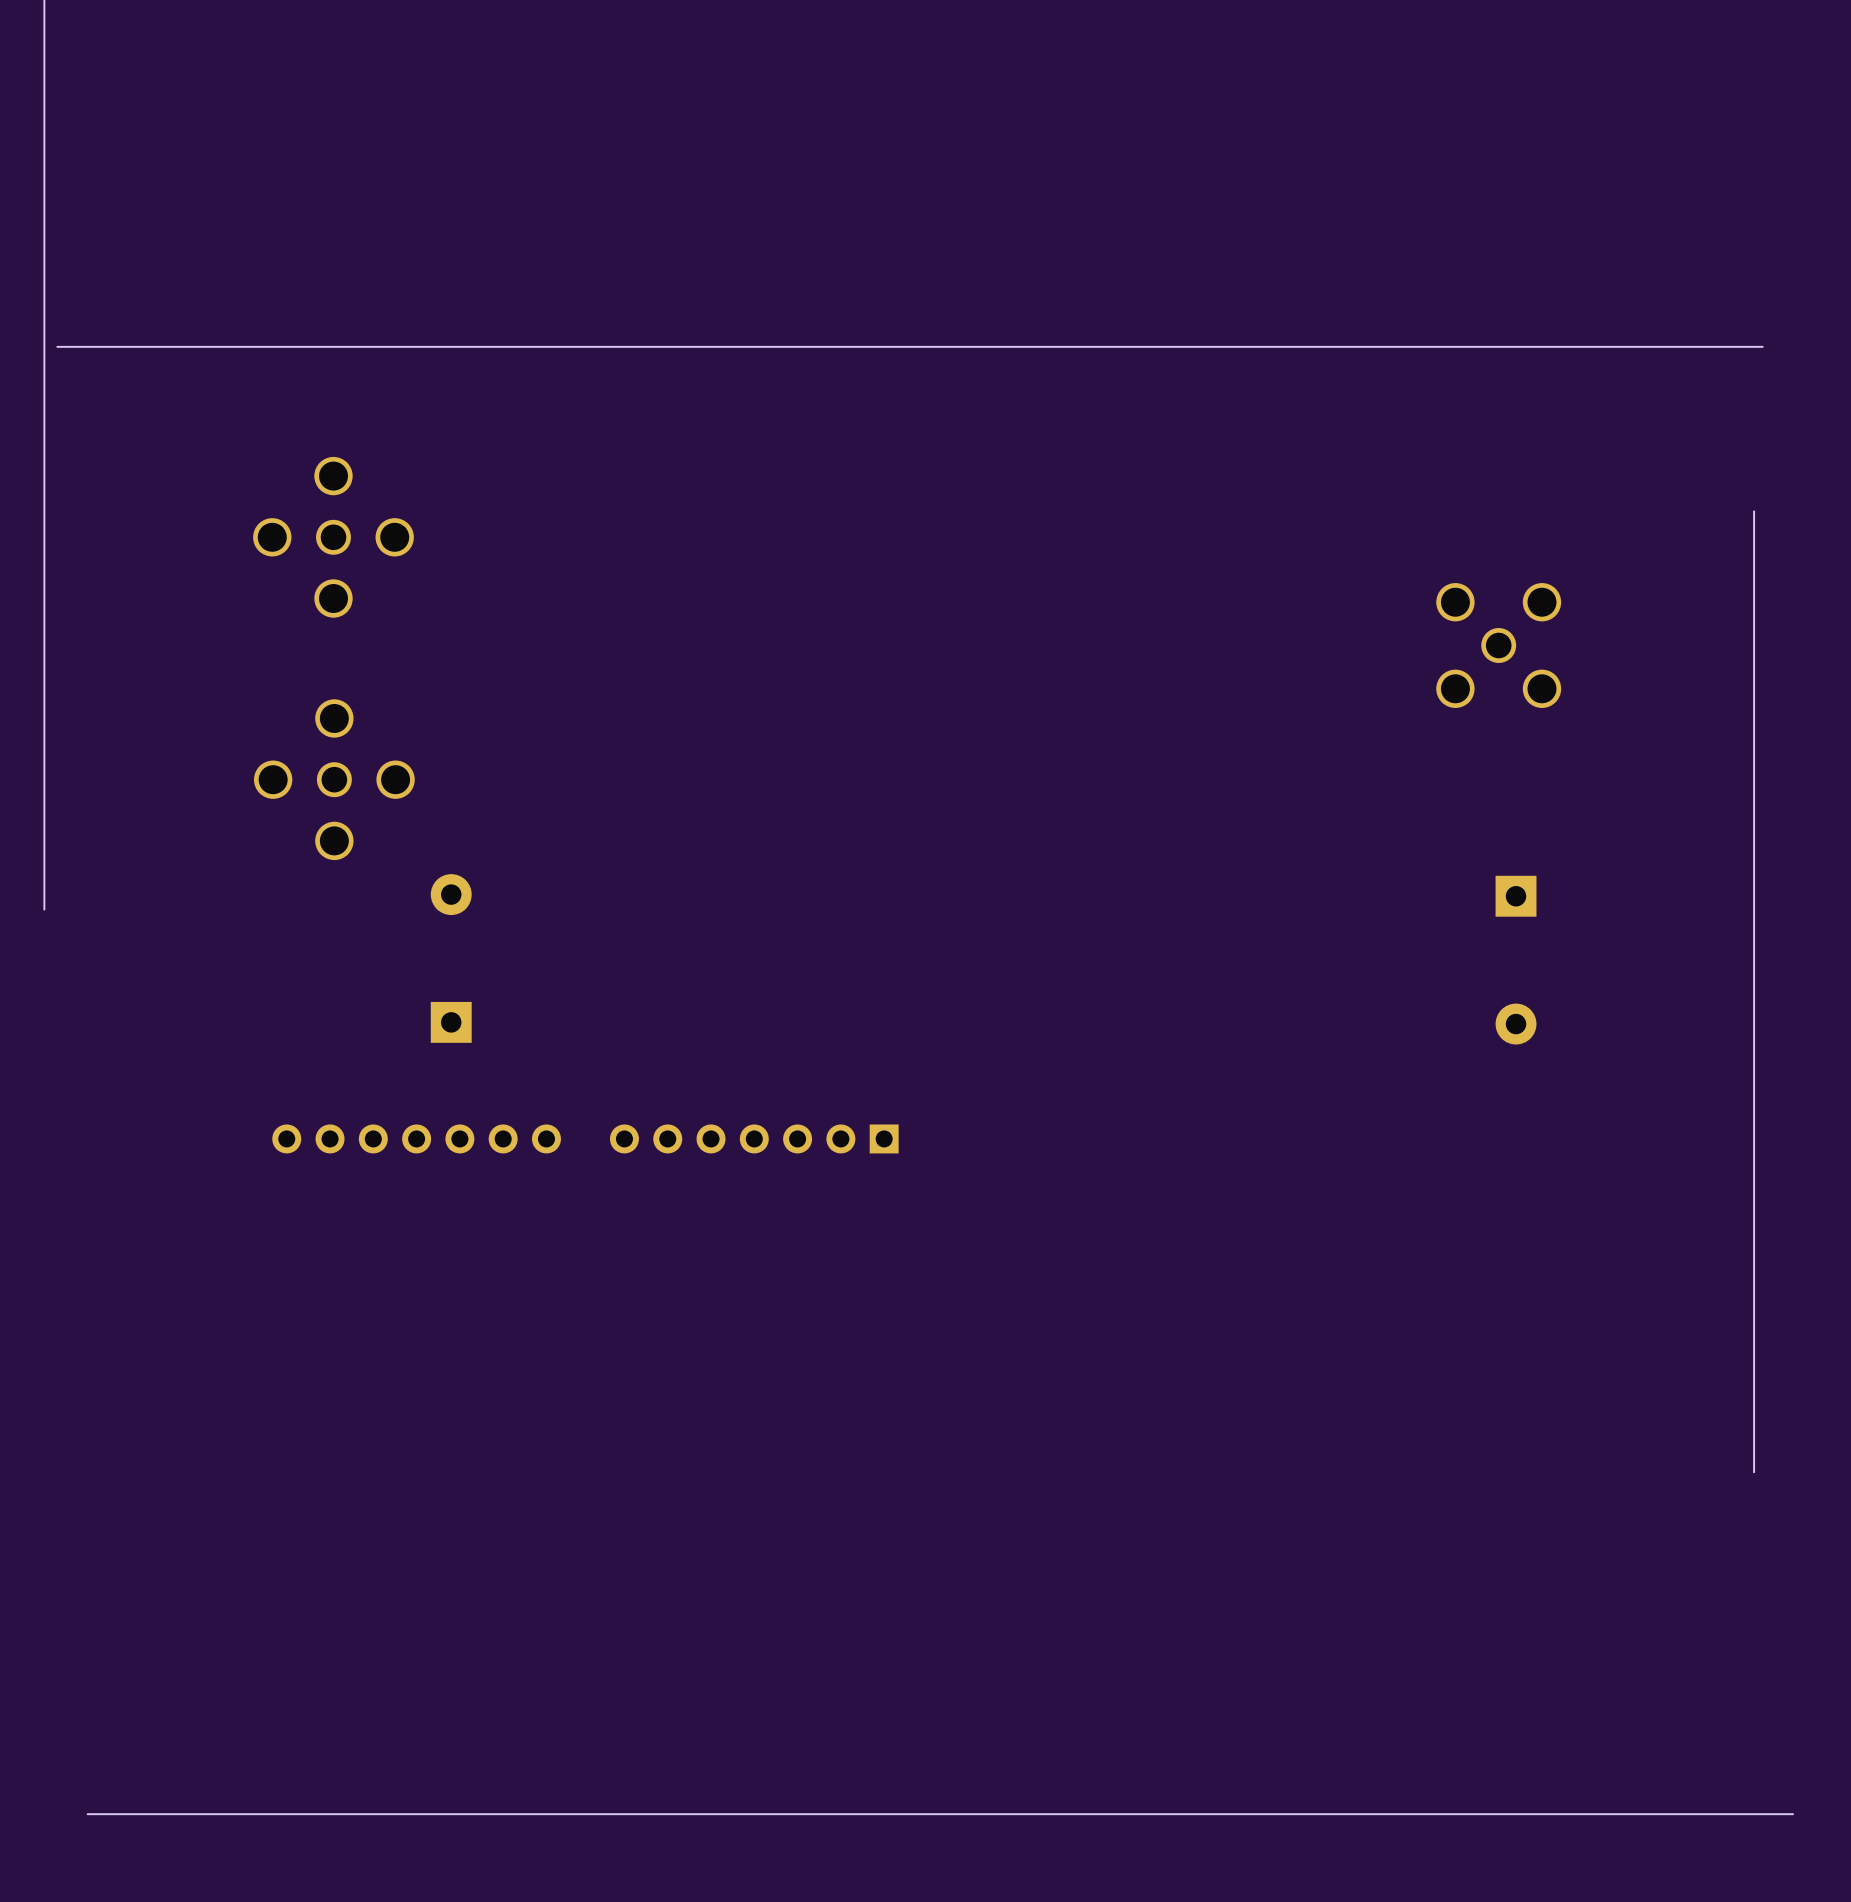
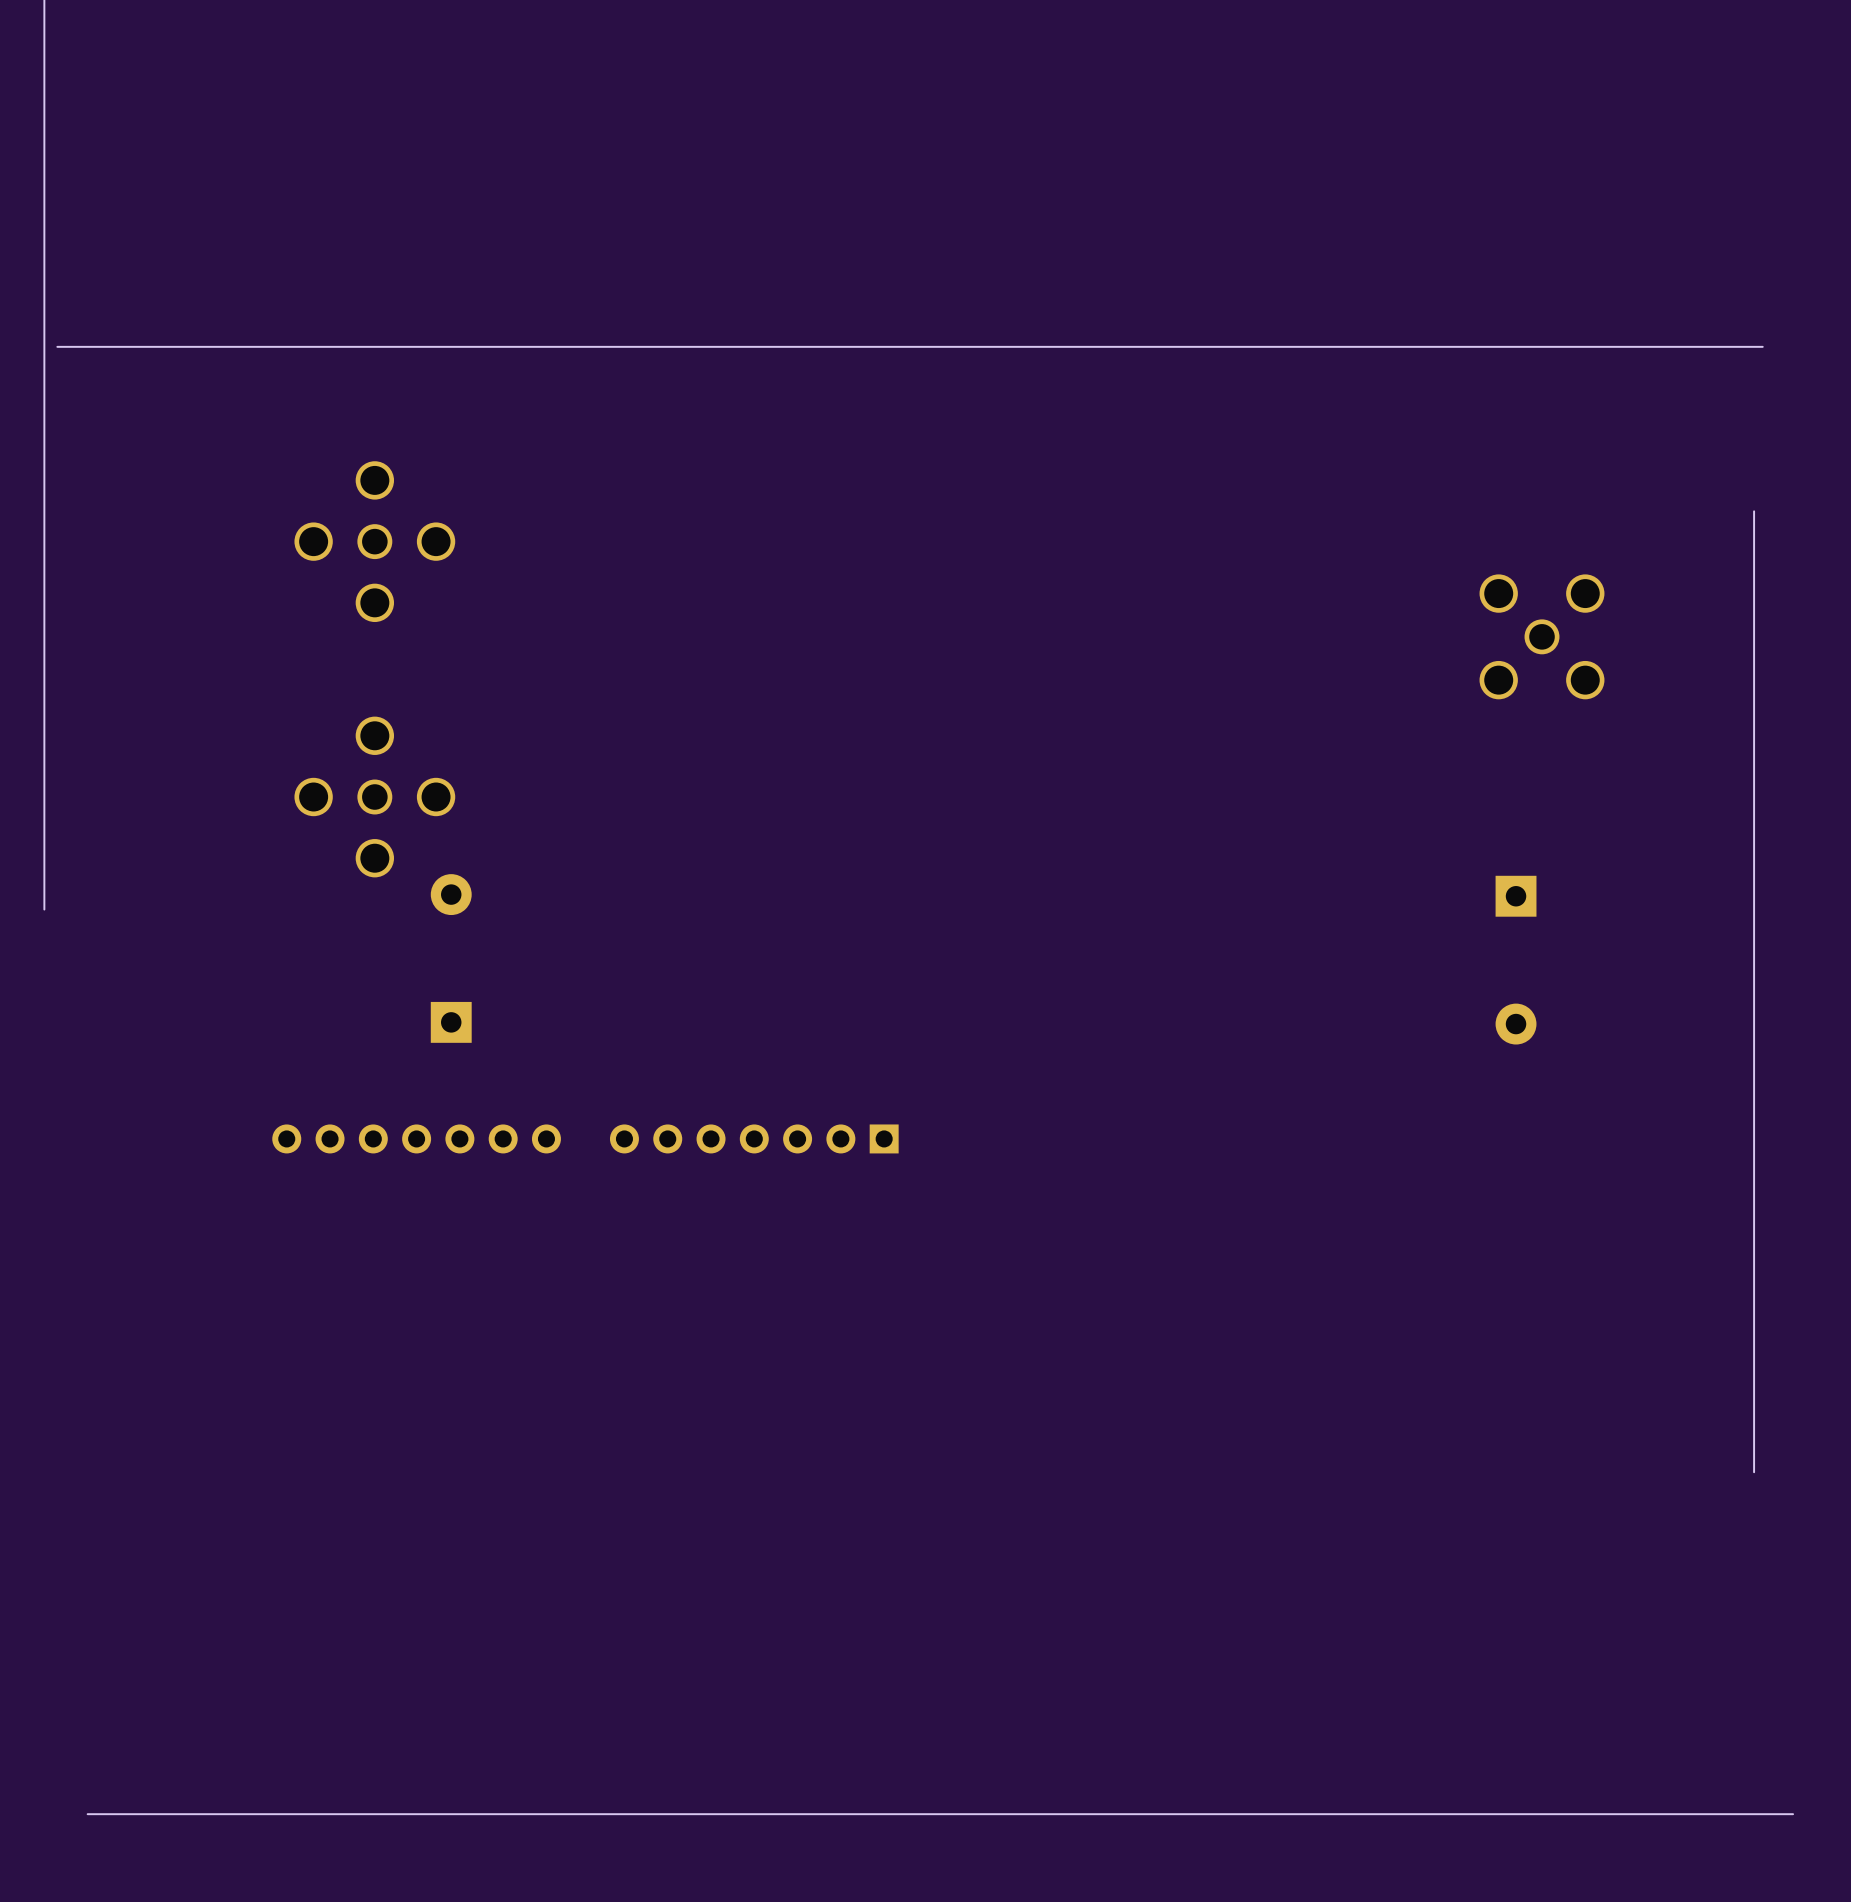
part position: (333, 537) -> (374, 541)
part position: (1498, 645) -> (1541, 636)
part position: (334, 779) -> (374, 797)

